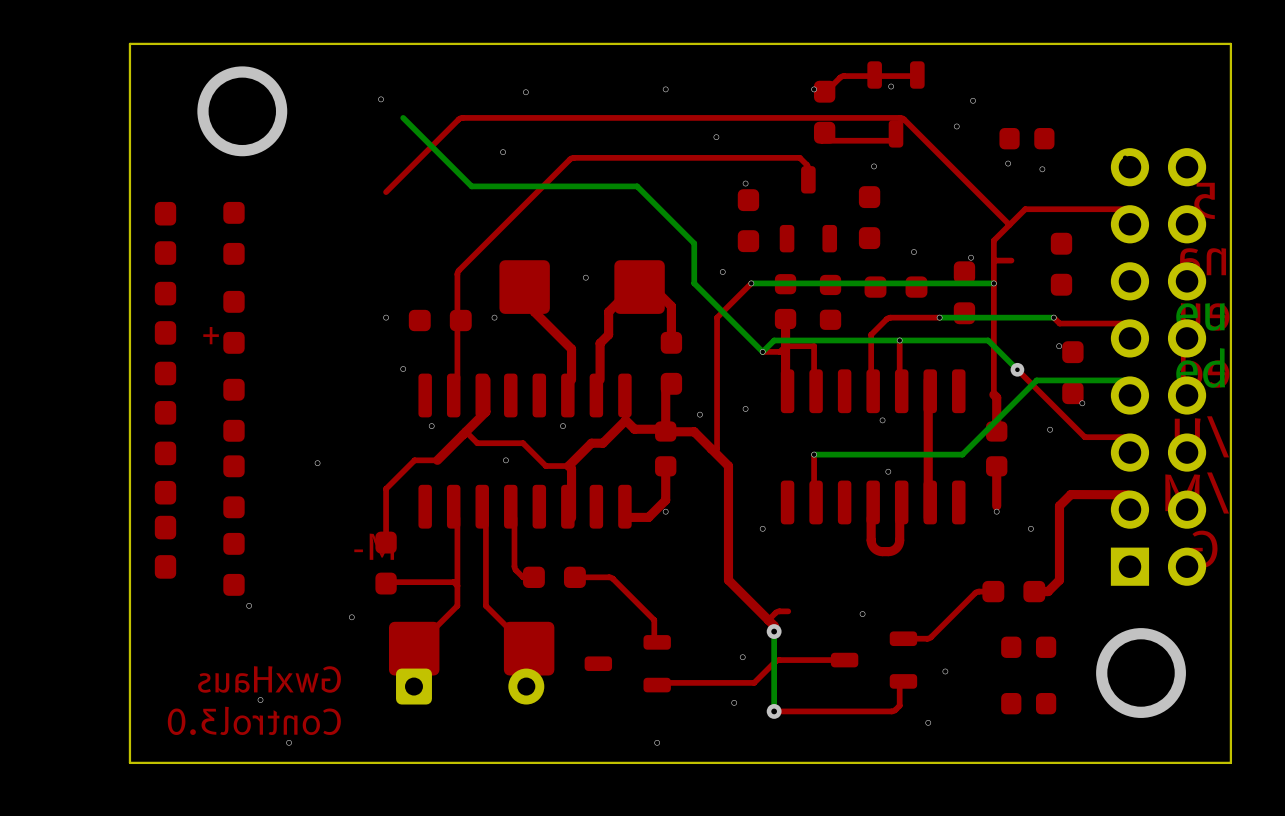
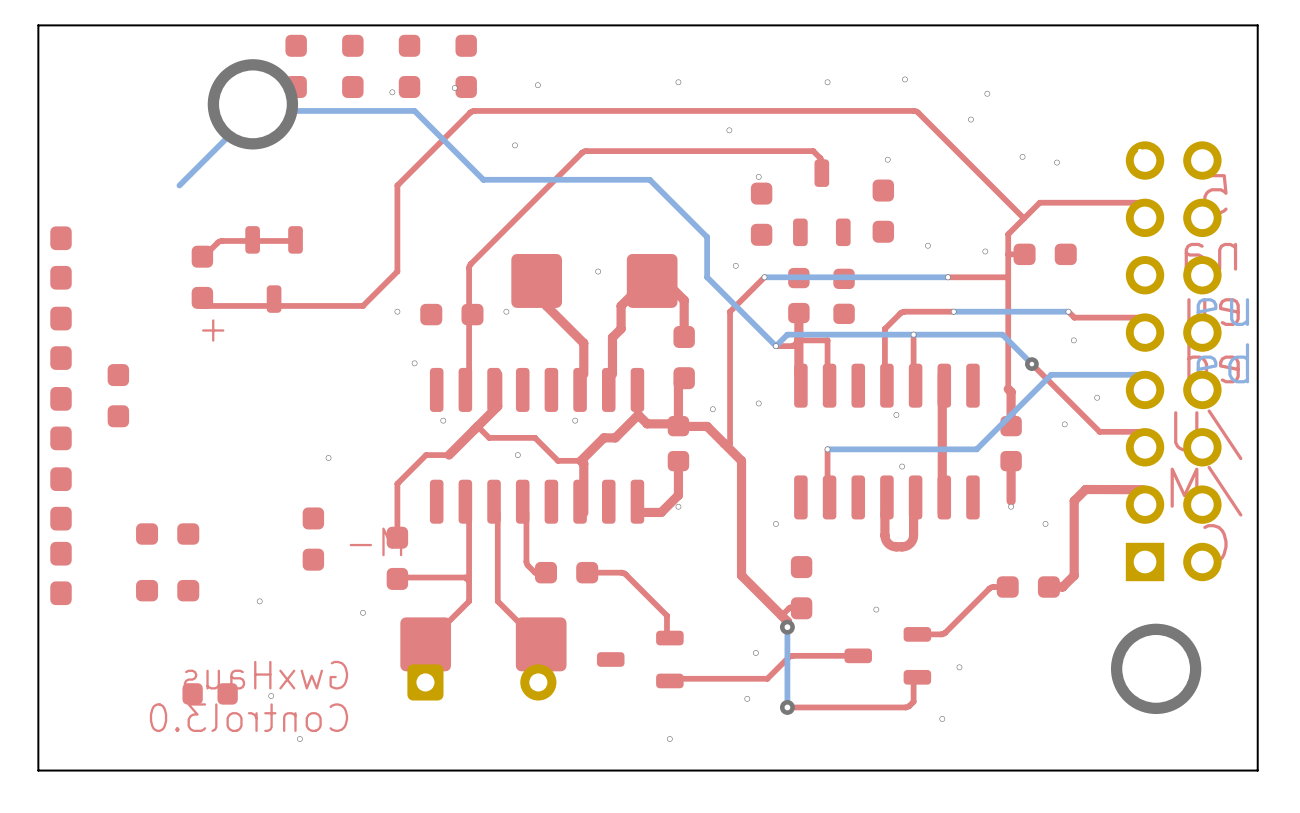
board edge: (1230, 43) (129, 43) (129, 762) (1230, 762) (1230, 43) -> (1257, 25) (1257, 770) (38, 770) (38, 25) (1257, 25)
part: none -> (296, 66)
part: none -> (352, 66)
part: none -> (409, 66)
part: none -> (466, 66)
top track: (917, 76) (843, 76) (824, 93) -> none
via: none -> (454, 88)
part: (895, 104) -> none
part: (824, 112) -> none
bottom track: none -> (414, 110) (254, 110) (179, 185)
top track: (895, 125) (895, 136) (893, 140) (821, 140) (824, 131) -> none
part: (1026, 138) -> none
top track: none -> (397, 185) (397, 271) (362, 305) (199, 305) (202, 296)
part: (165, 233) -> none
part: (233, 233) -> none
top track: none -> (295, 240) (221, 241) (202, 258)
part: none -> (61, 258)
part rotation: 0° (1061, 264) -> 90° clockwise (1045, 254)
part: none -> (274, 269)
part: none -> (202, 277)
top track: none -> (1008, 277) (948, 277)
bottom track: (993, 283) (933, 283) -> none
via position: (993, 283) -> (948, 277)
part: (895, 287) -> none
part: (964, 292) -> none
part: (165, 313) -> none
part: (233, 322) -> none
part: none -> (61, 338)
part: (1072, 372) -> none
part: (165, 393) -> none
part: none -> (118, 395)
part: (233, 410) -> none
part: none -> (61, 418)
part: (165, 473) -> none
part: (233, 486) -> none
part: none -> (61, 498)
part footprint: [154, 515, 177, 579] -> [136, 523, 200, 545]
part: none -> (313, 539)
part: (233, 564) -> none
part: none -> (61, 573)
part: none -> (801, 587)
part: none -> (167, 590)
part: (1028, 647) -> none
part: none -> (210, 693)
part: (1028, 703) -> none

